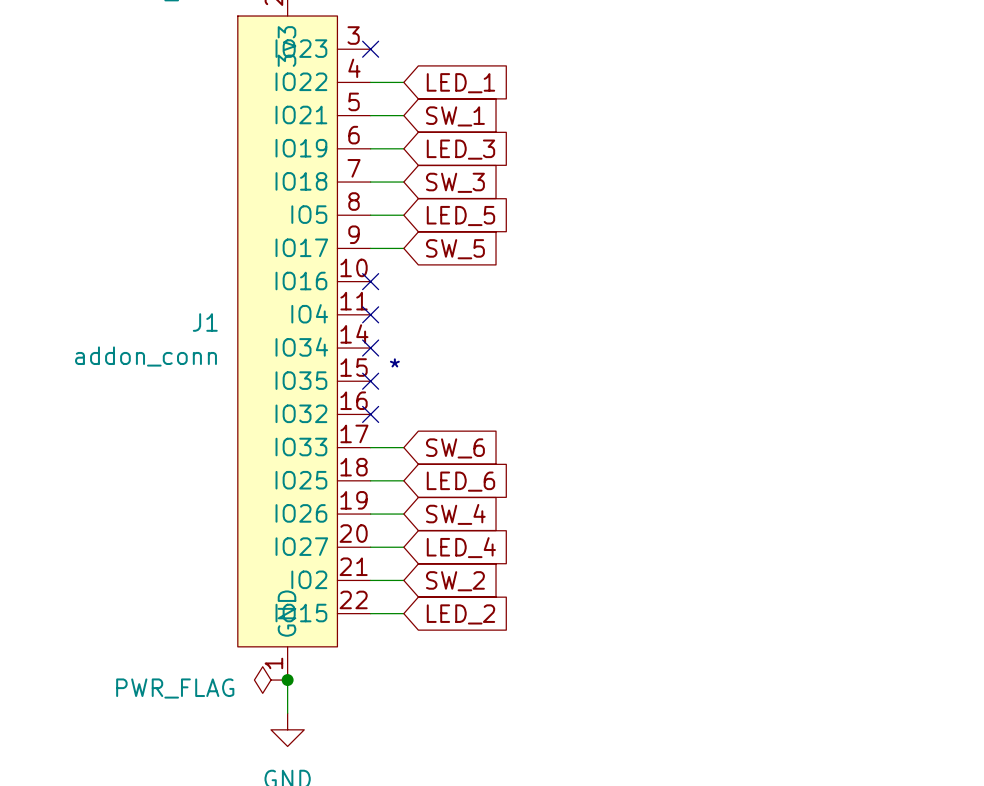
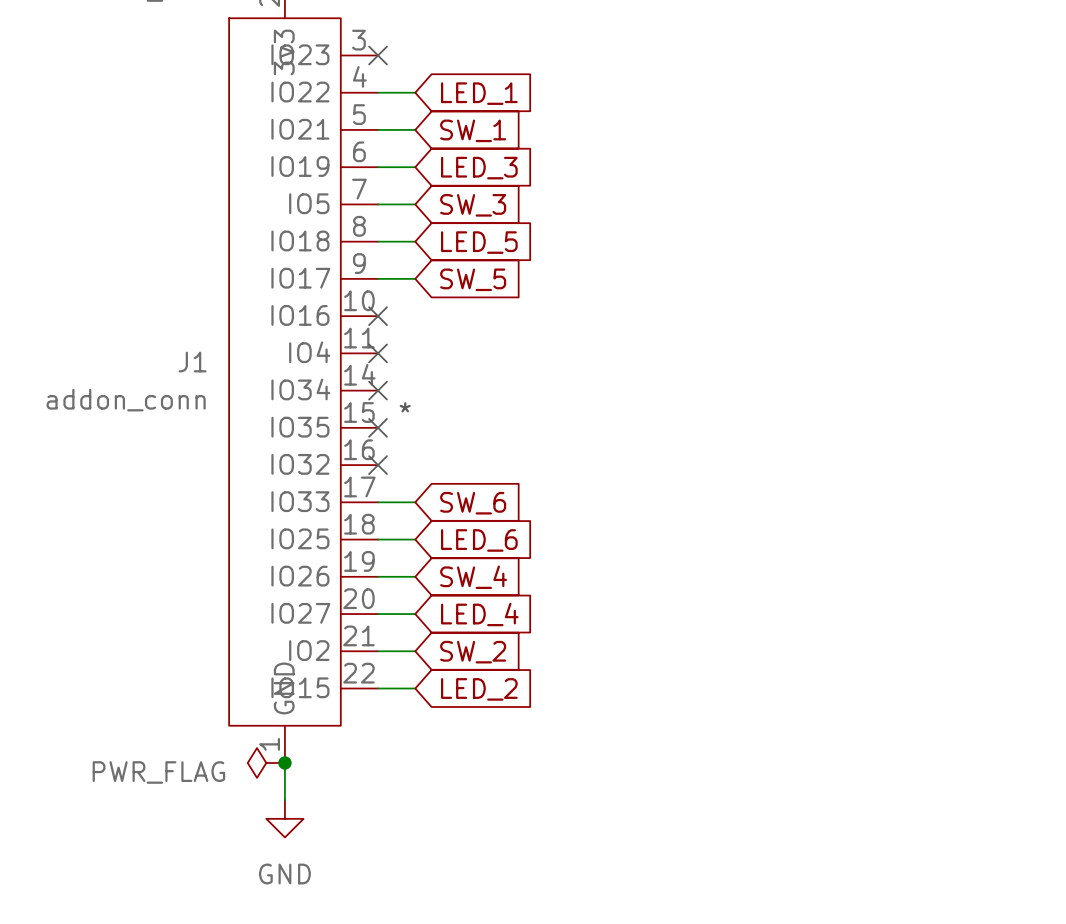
J1 pin name: IO18 (301, 181) -> IO5 (309, 203)
J1 pin name: IO5 (309, 214) -> IO18 (300, 240)

